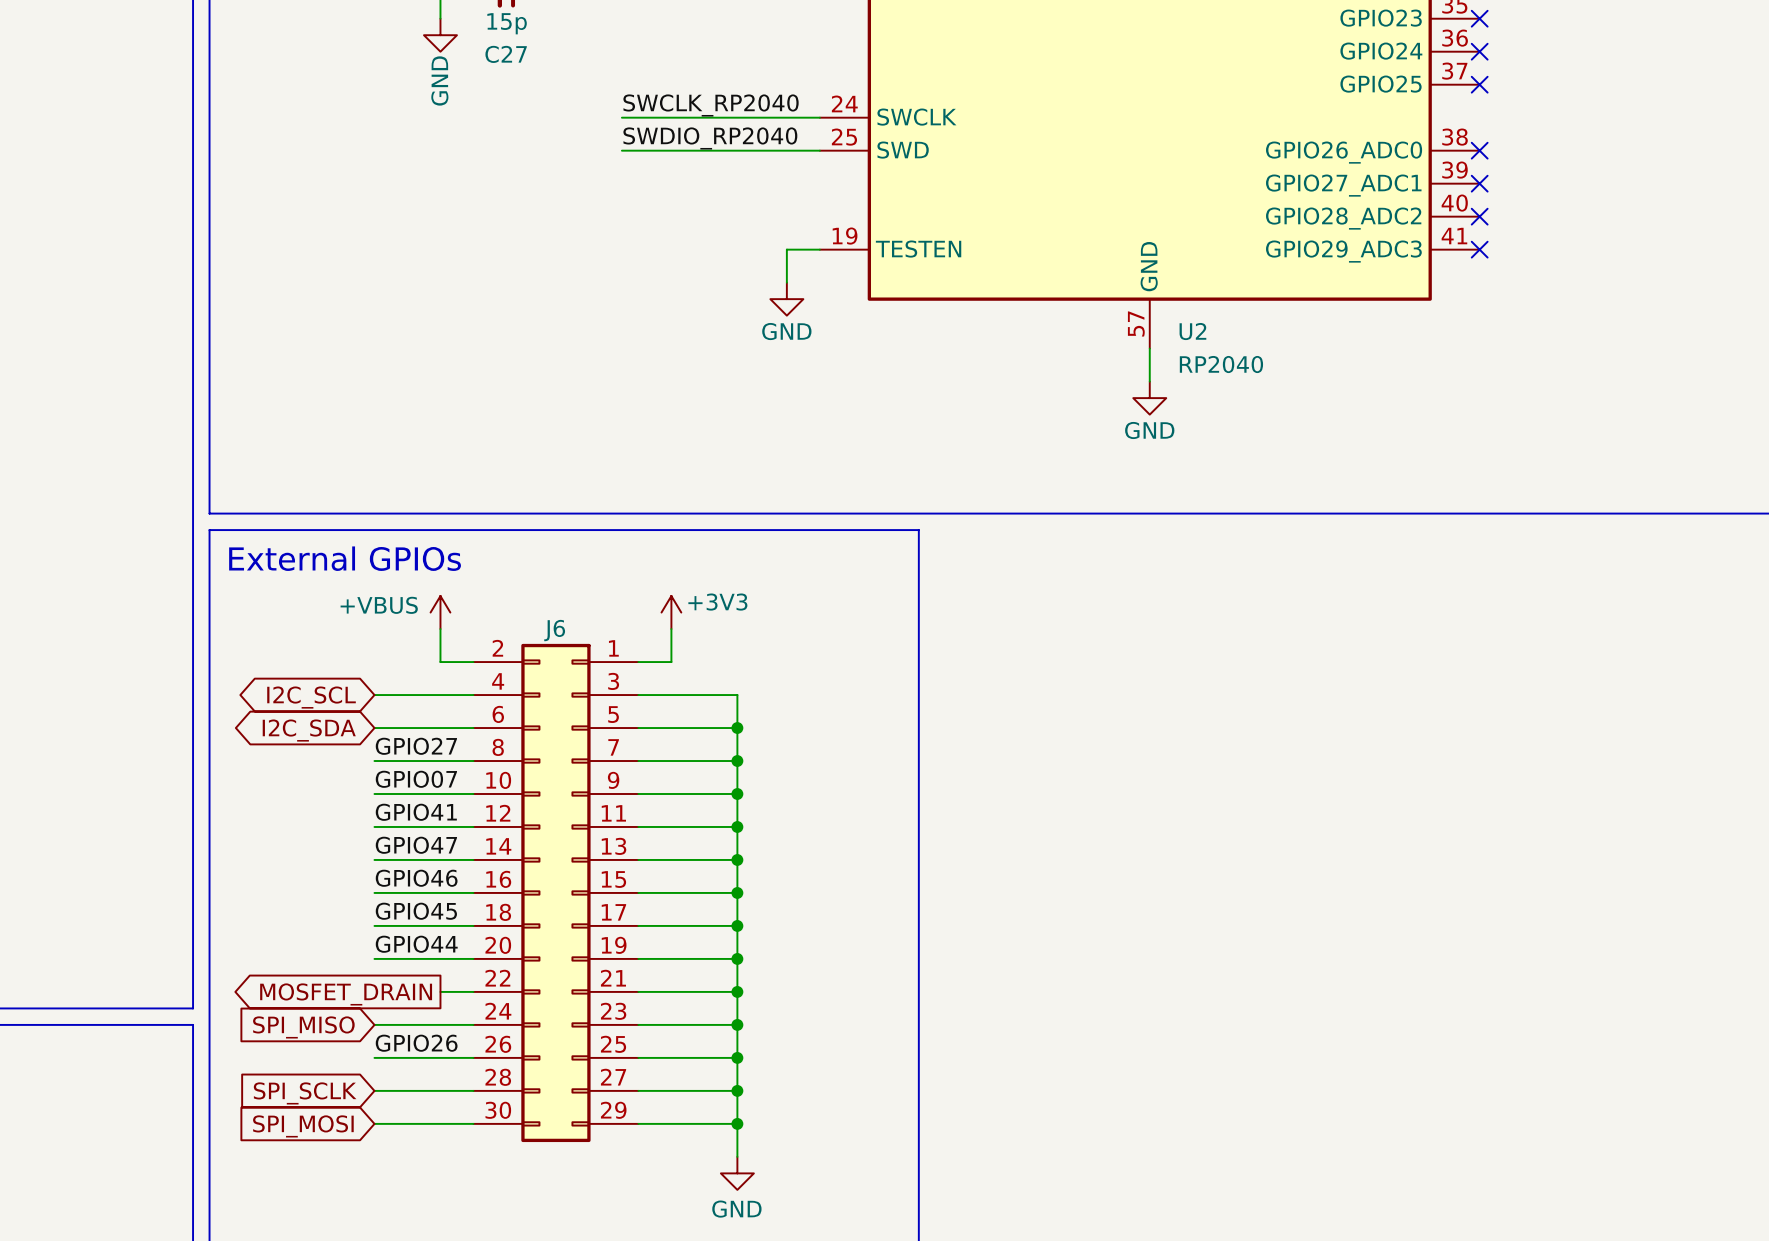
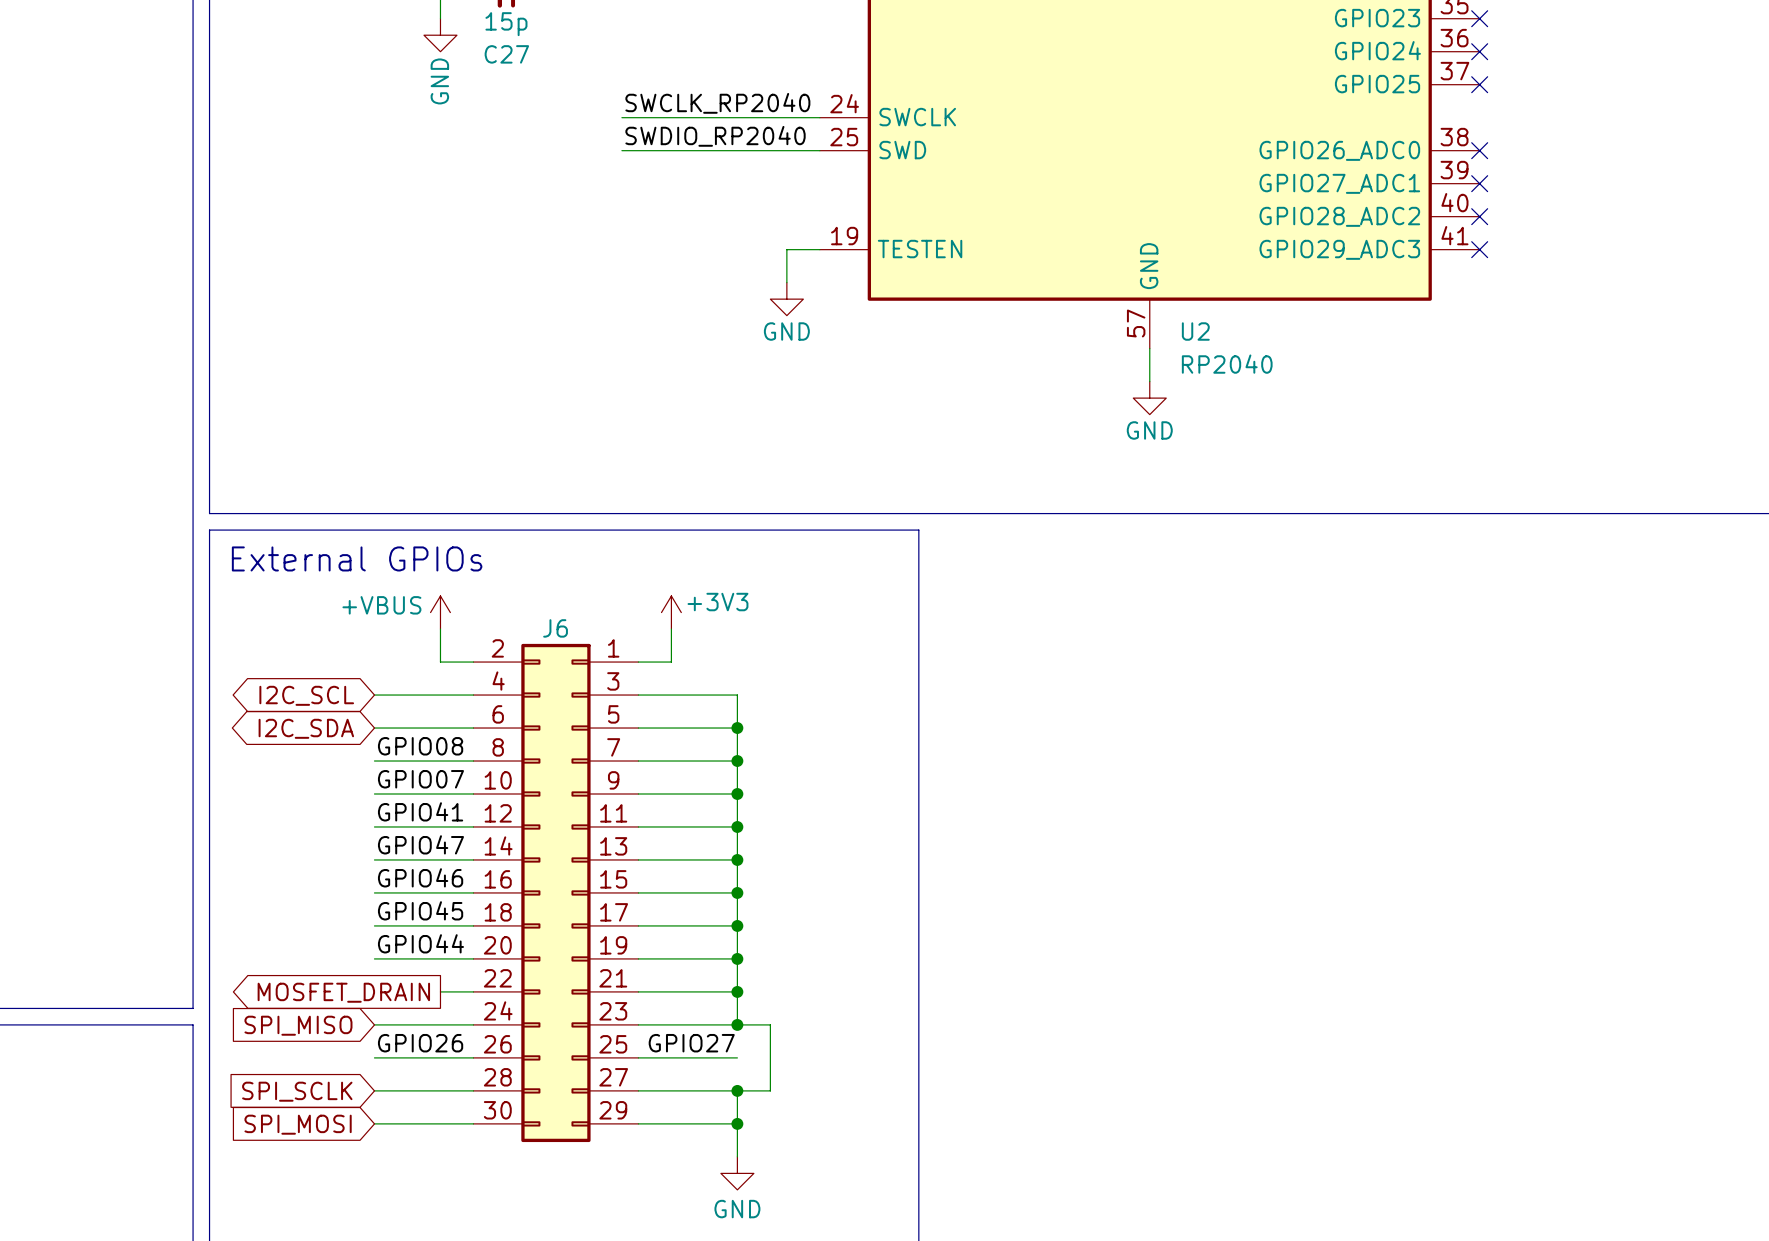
label: GPIO27 (416, 746) -> GPIO08 (420, 746)
wire: (737, 1024) (737, 1090) -> (737, 1024) (770, 1024) (770, 1090) (737, 1090)
label: none -> GPIO27 (691, 1043)
junction: (737, 1057) -> none

